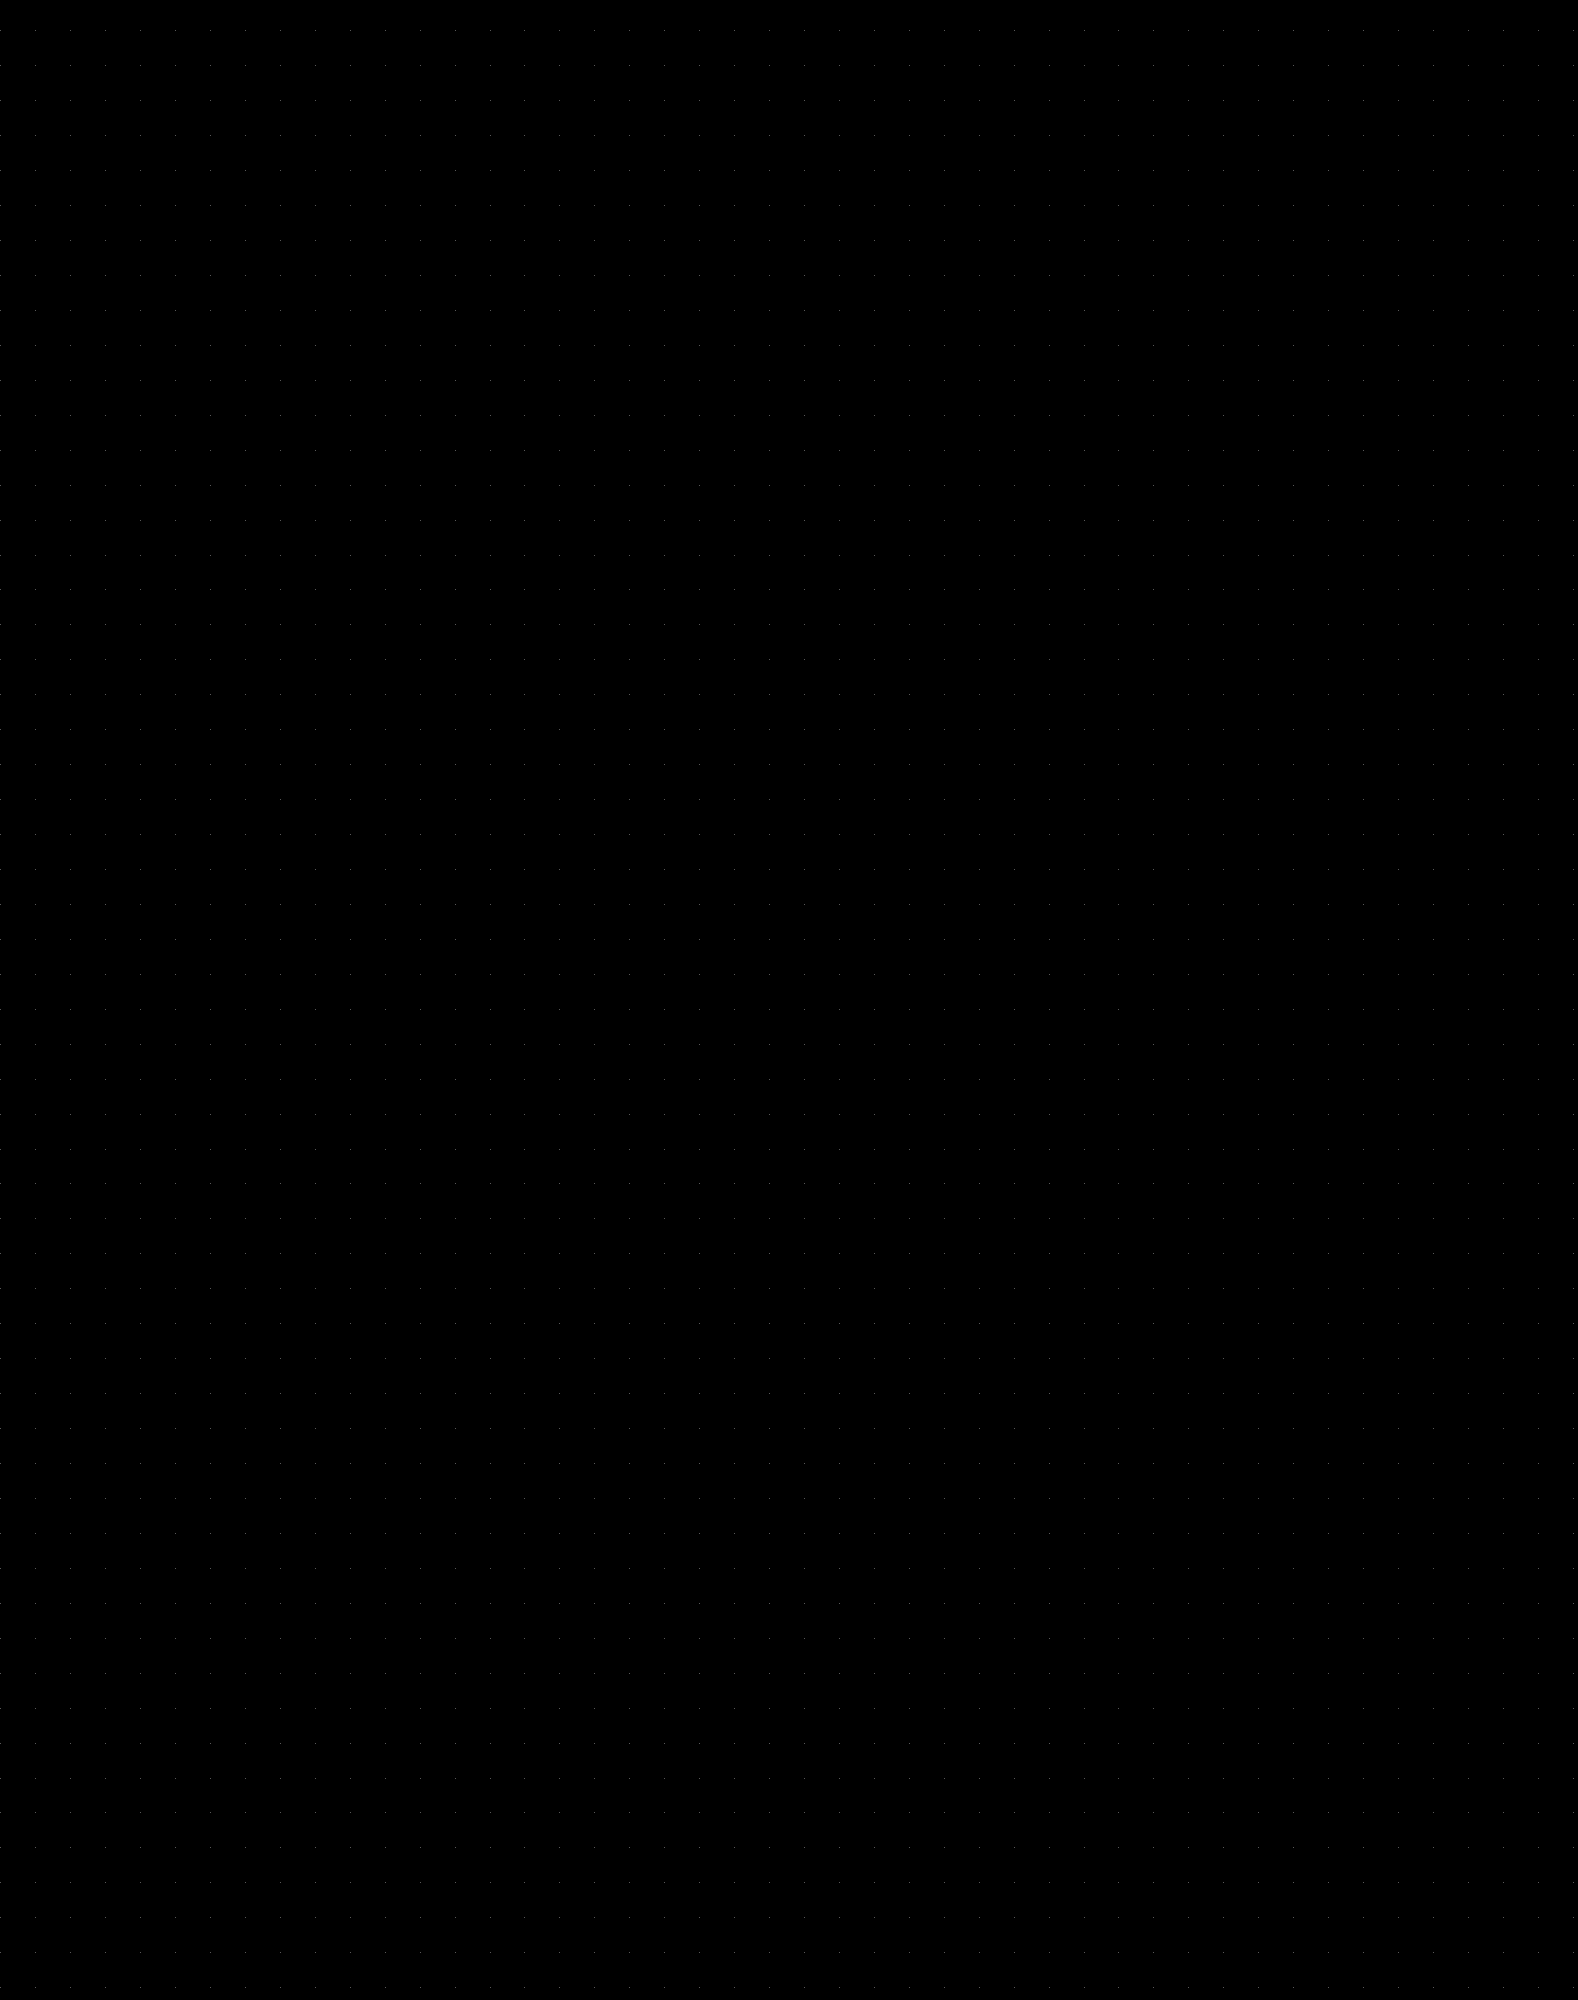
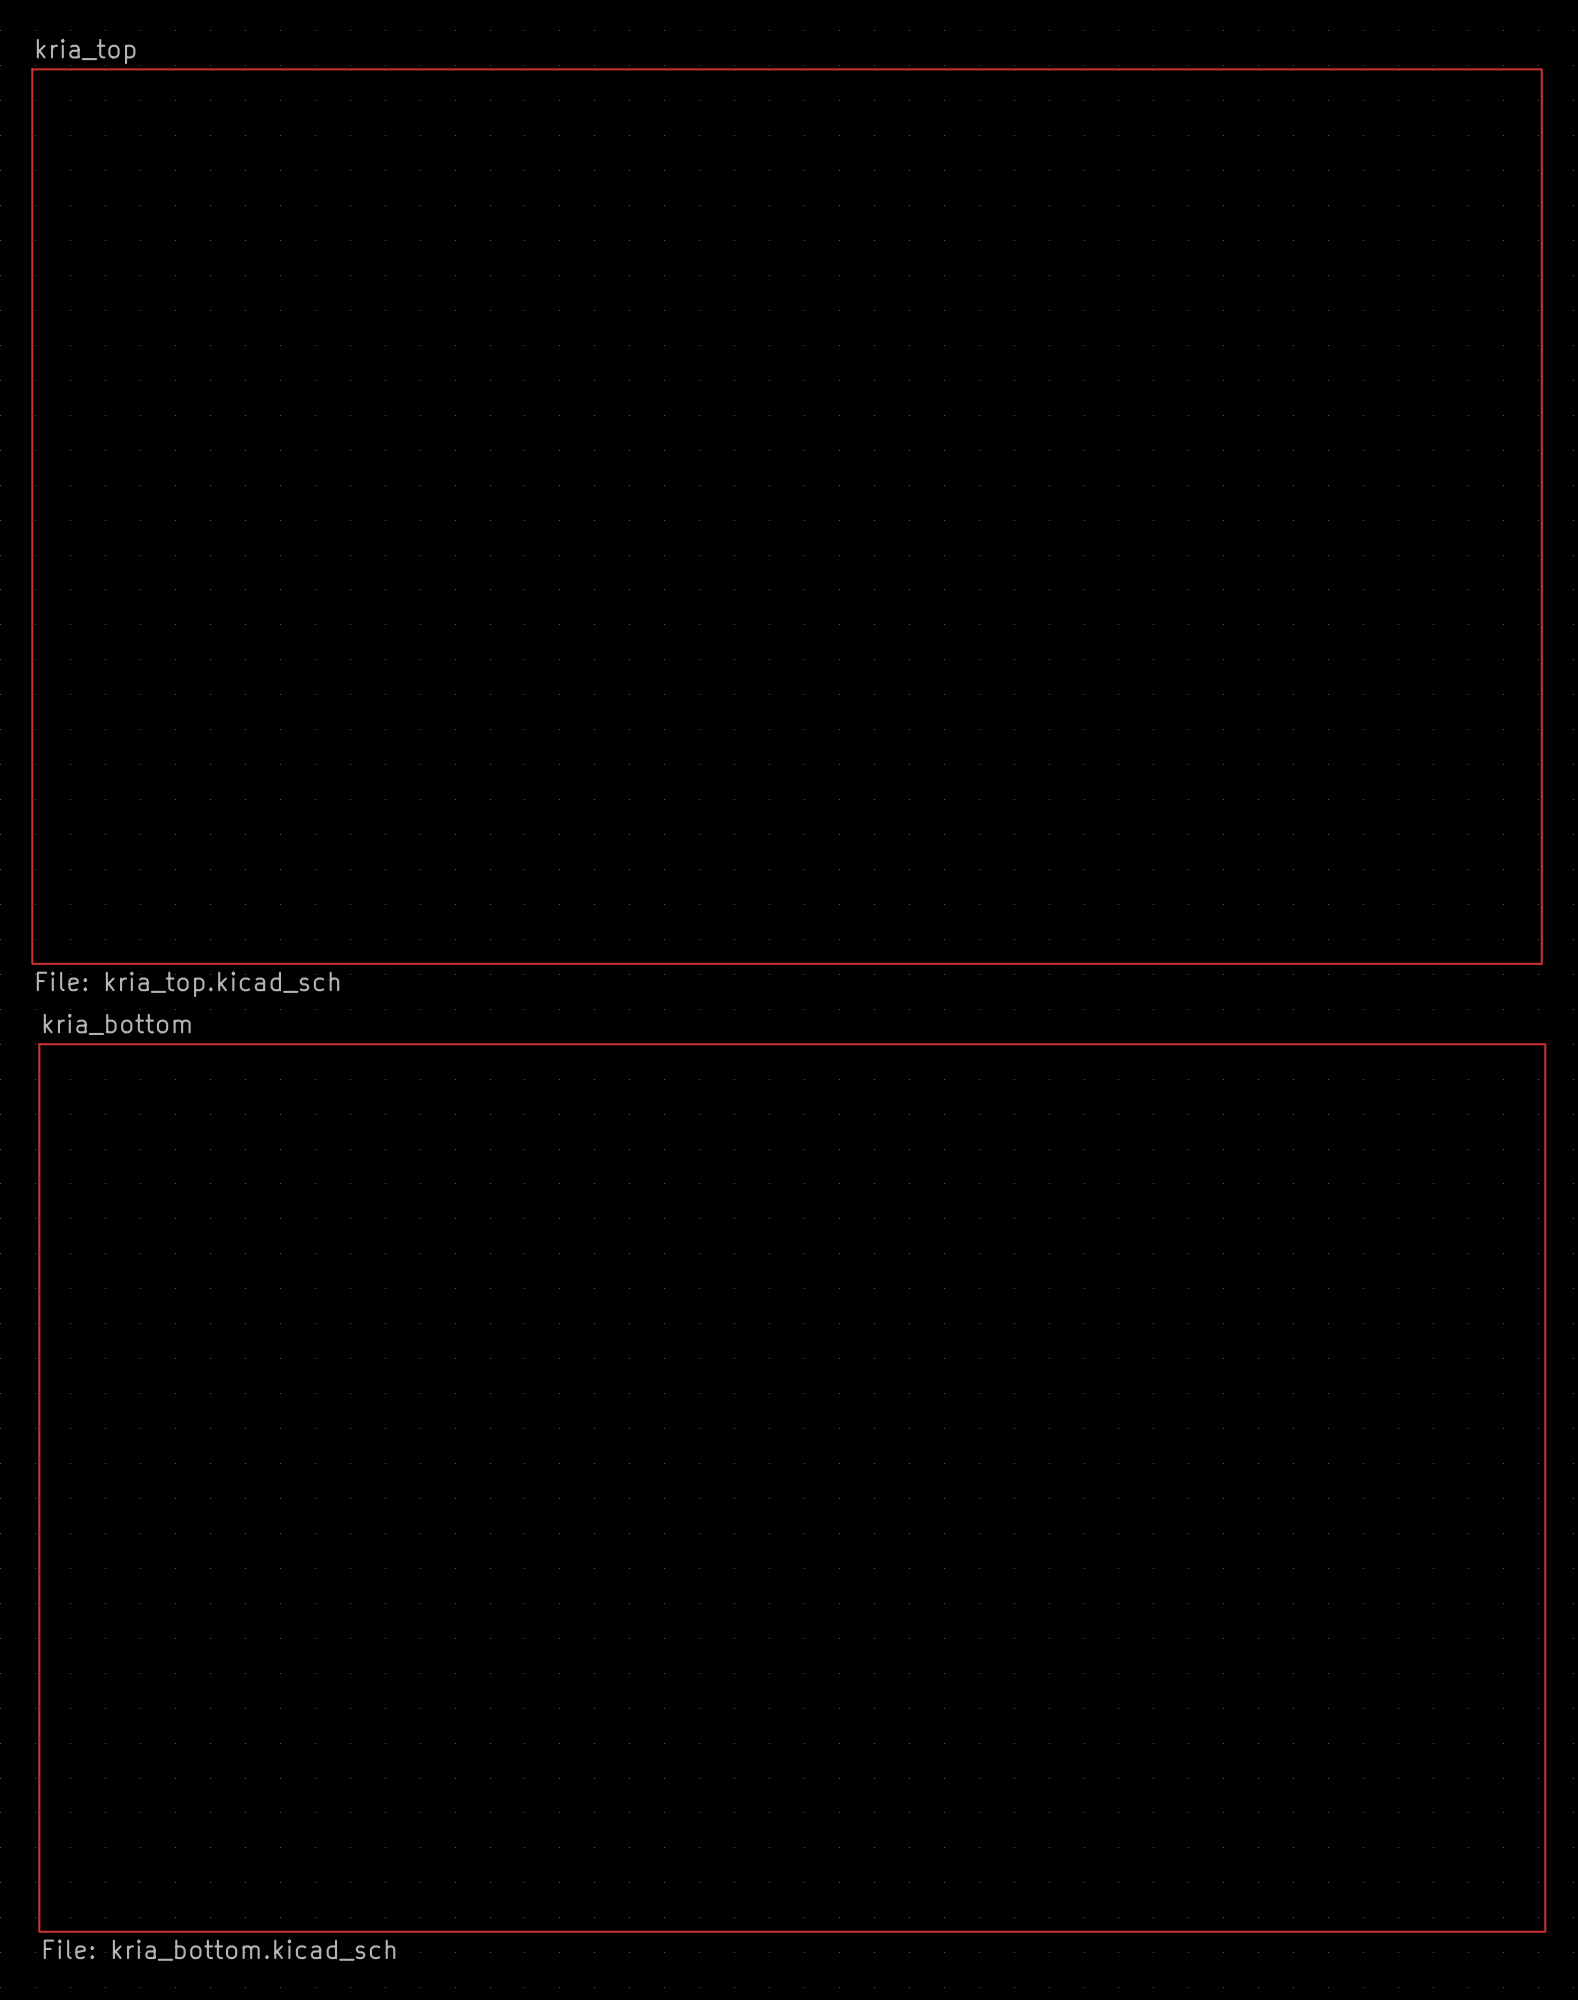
sheet kria_top: none -> File: kria_top.kicad_sch (787, 516)
sheet kria_bottom: none -> File: kria_bottom.kicad_sch (792, 1487)

